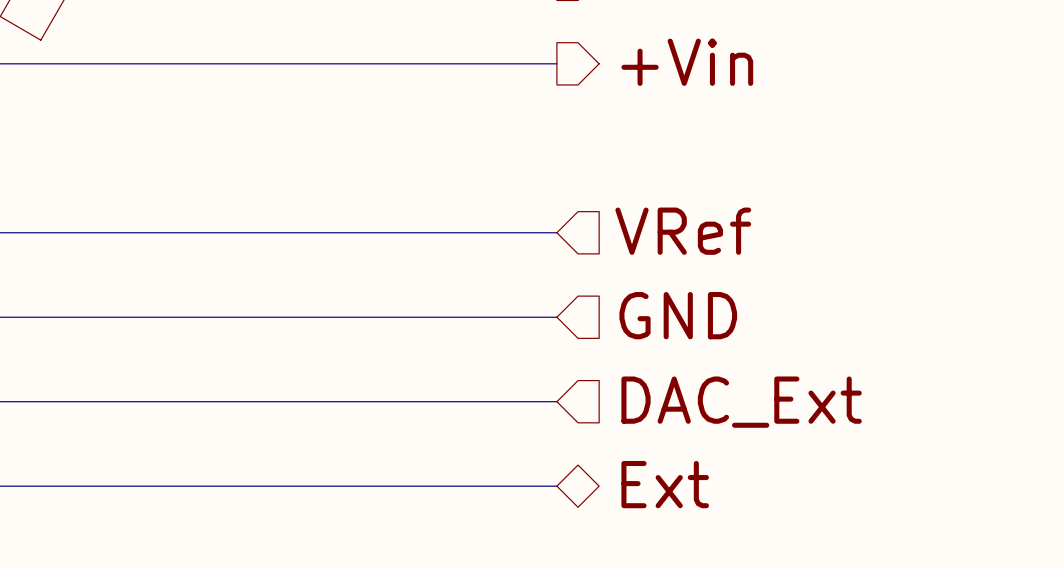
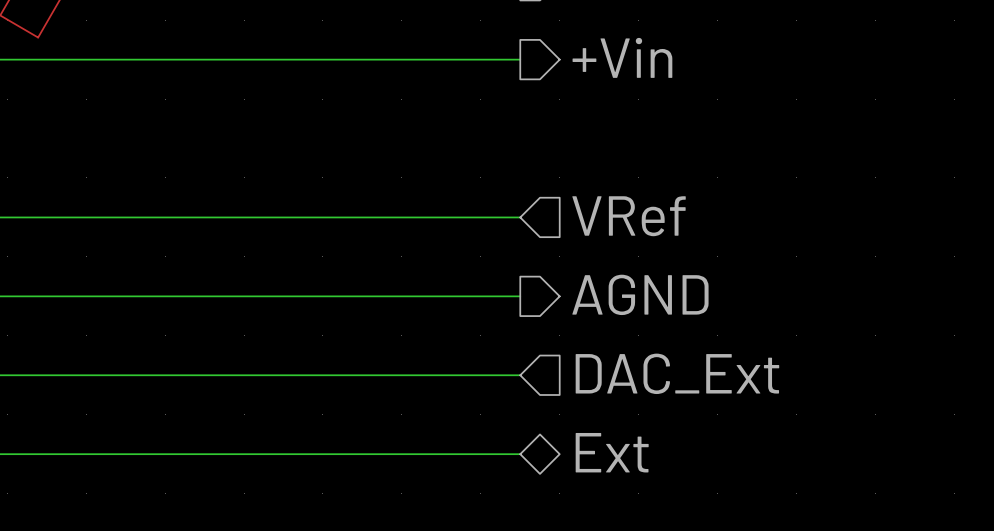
hierarchical label shape: input (678, 315) -> output (640, 294)
hierarchical label: GND (678, 315) -> AGND (640, 294)

